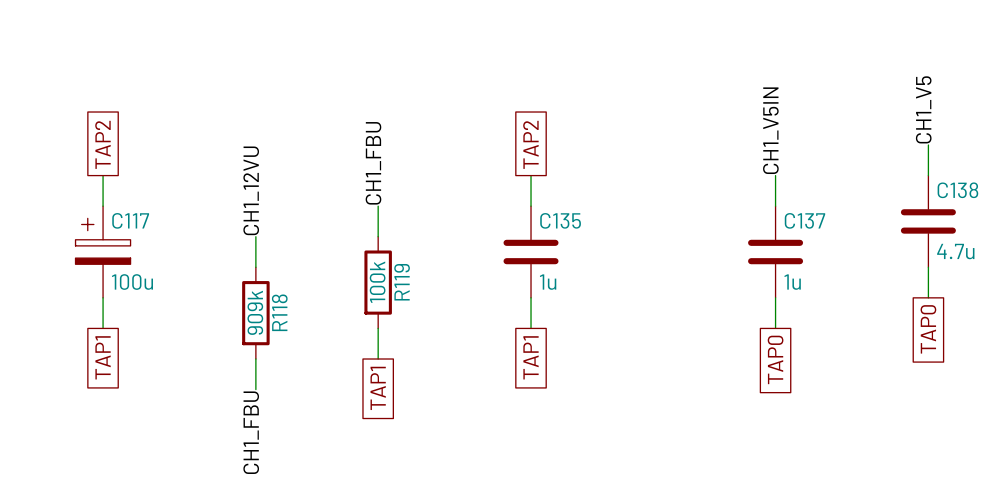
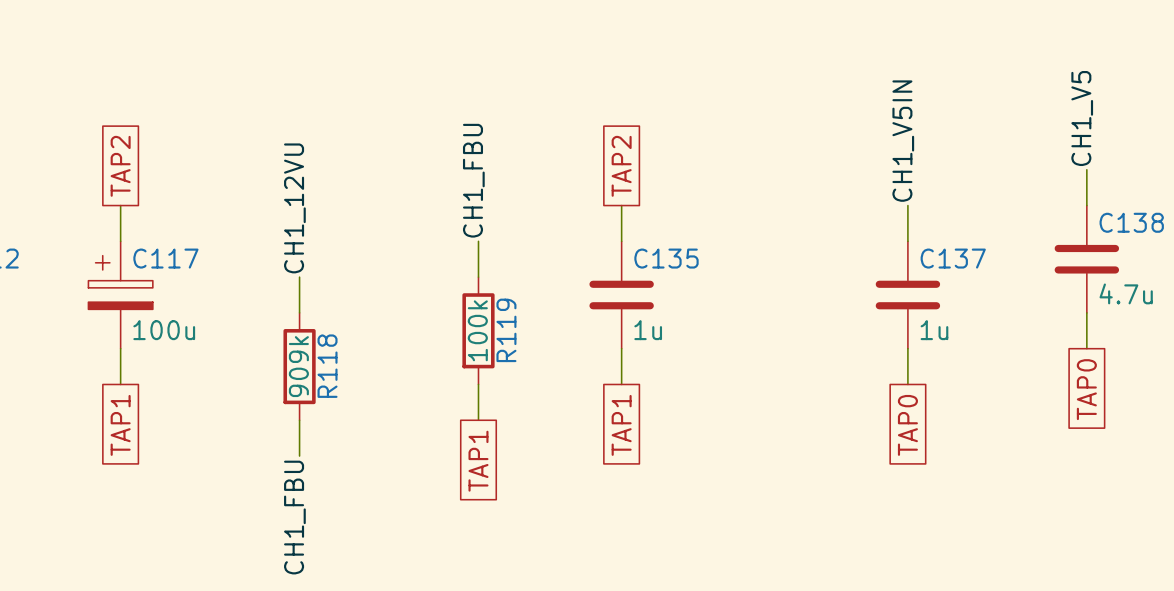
label position: CH1_FBU (373, 163) -> CH1_FBU (473, 180)
wire: (378, 206) (378, 236) -> (478, 241) (478, 277)
R119 position: (378, 282) -> (478, 330)
wire: (378, 328) (378, 359) -> (478, 384) (478, 420)
global label position: TAP1 (378, 388) -> TAP1 (478, 461)

